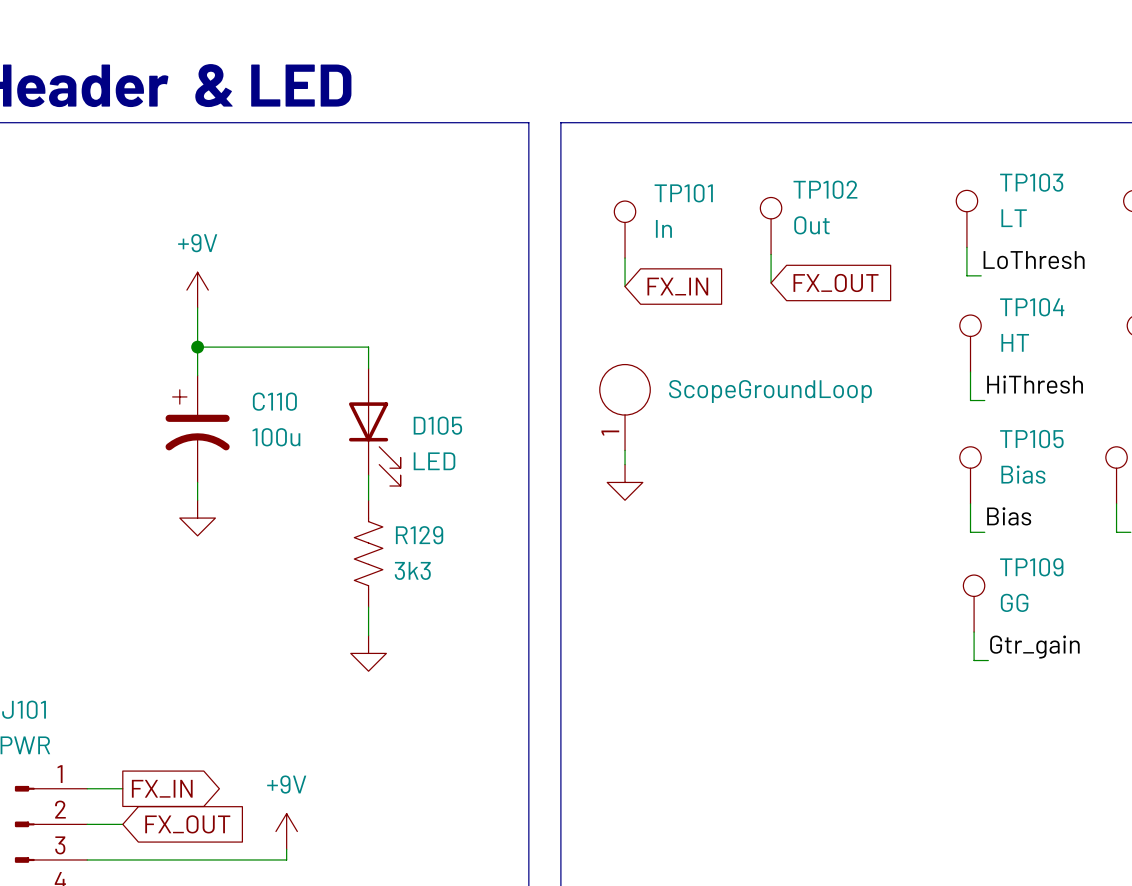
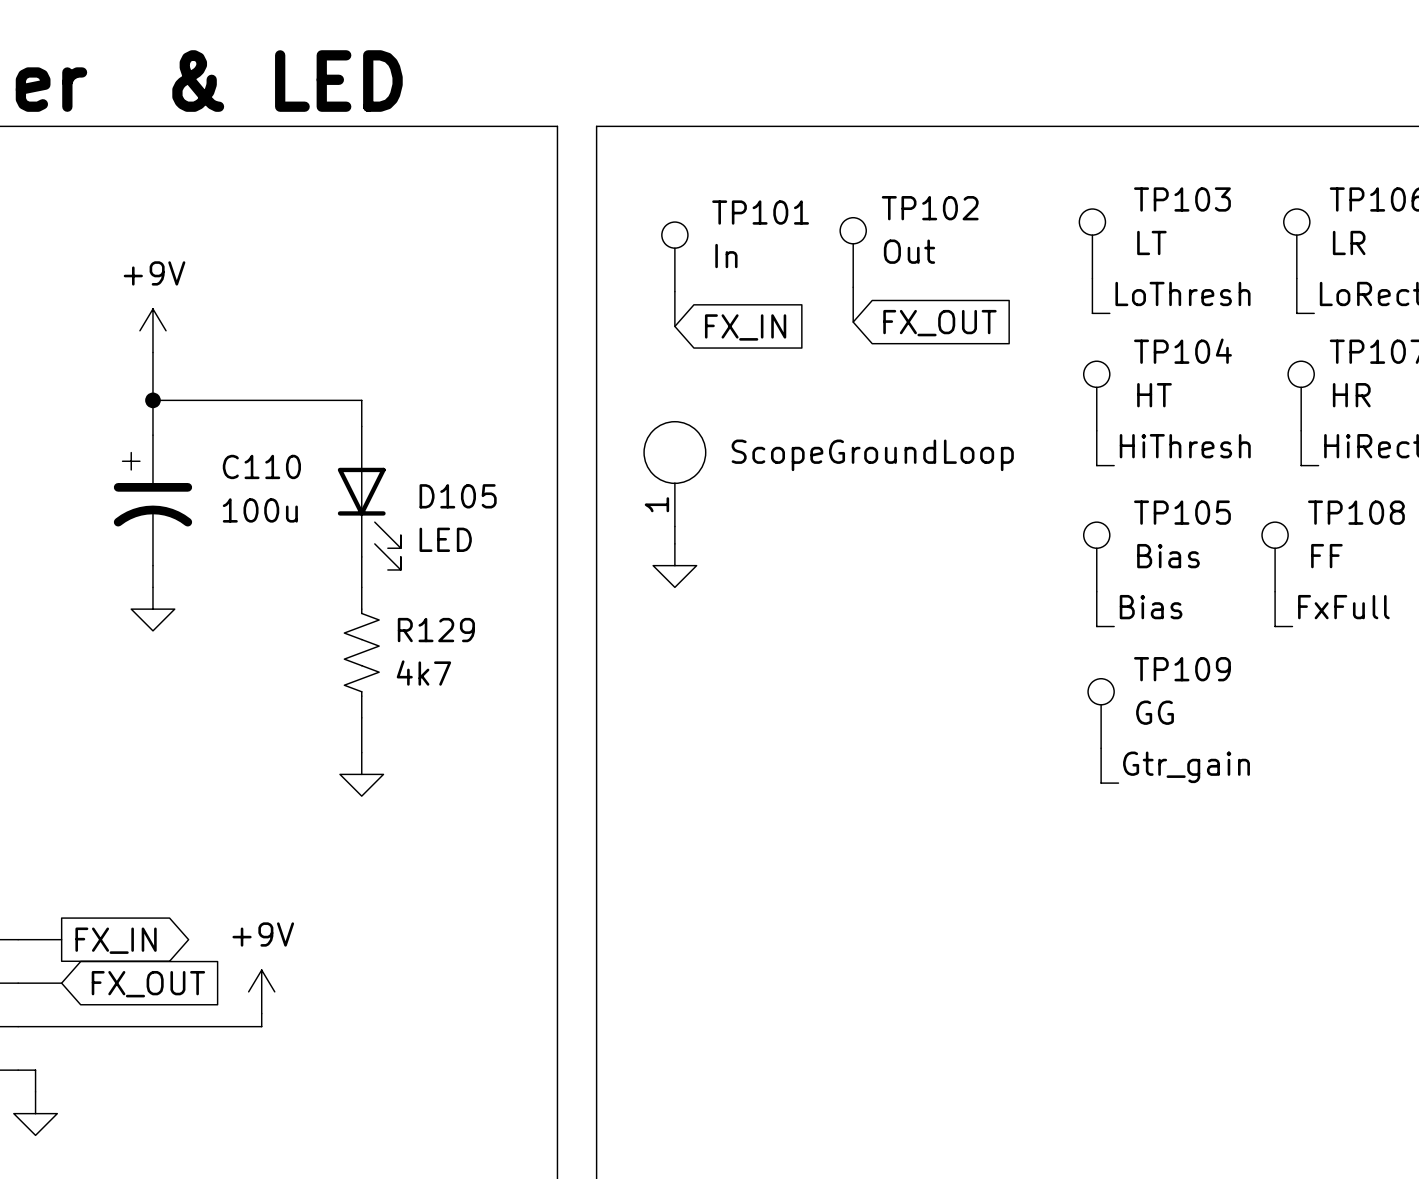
R129 value: 3k3 (412, 570) -> 4k7 (423, 673)

